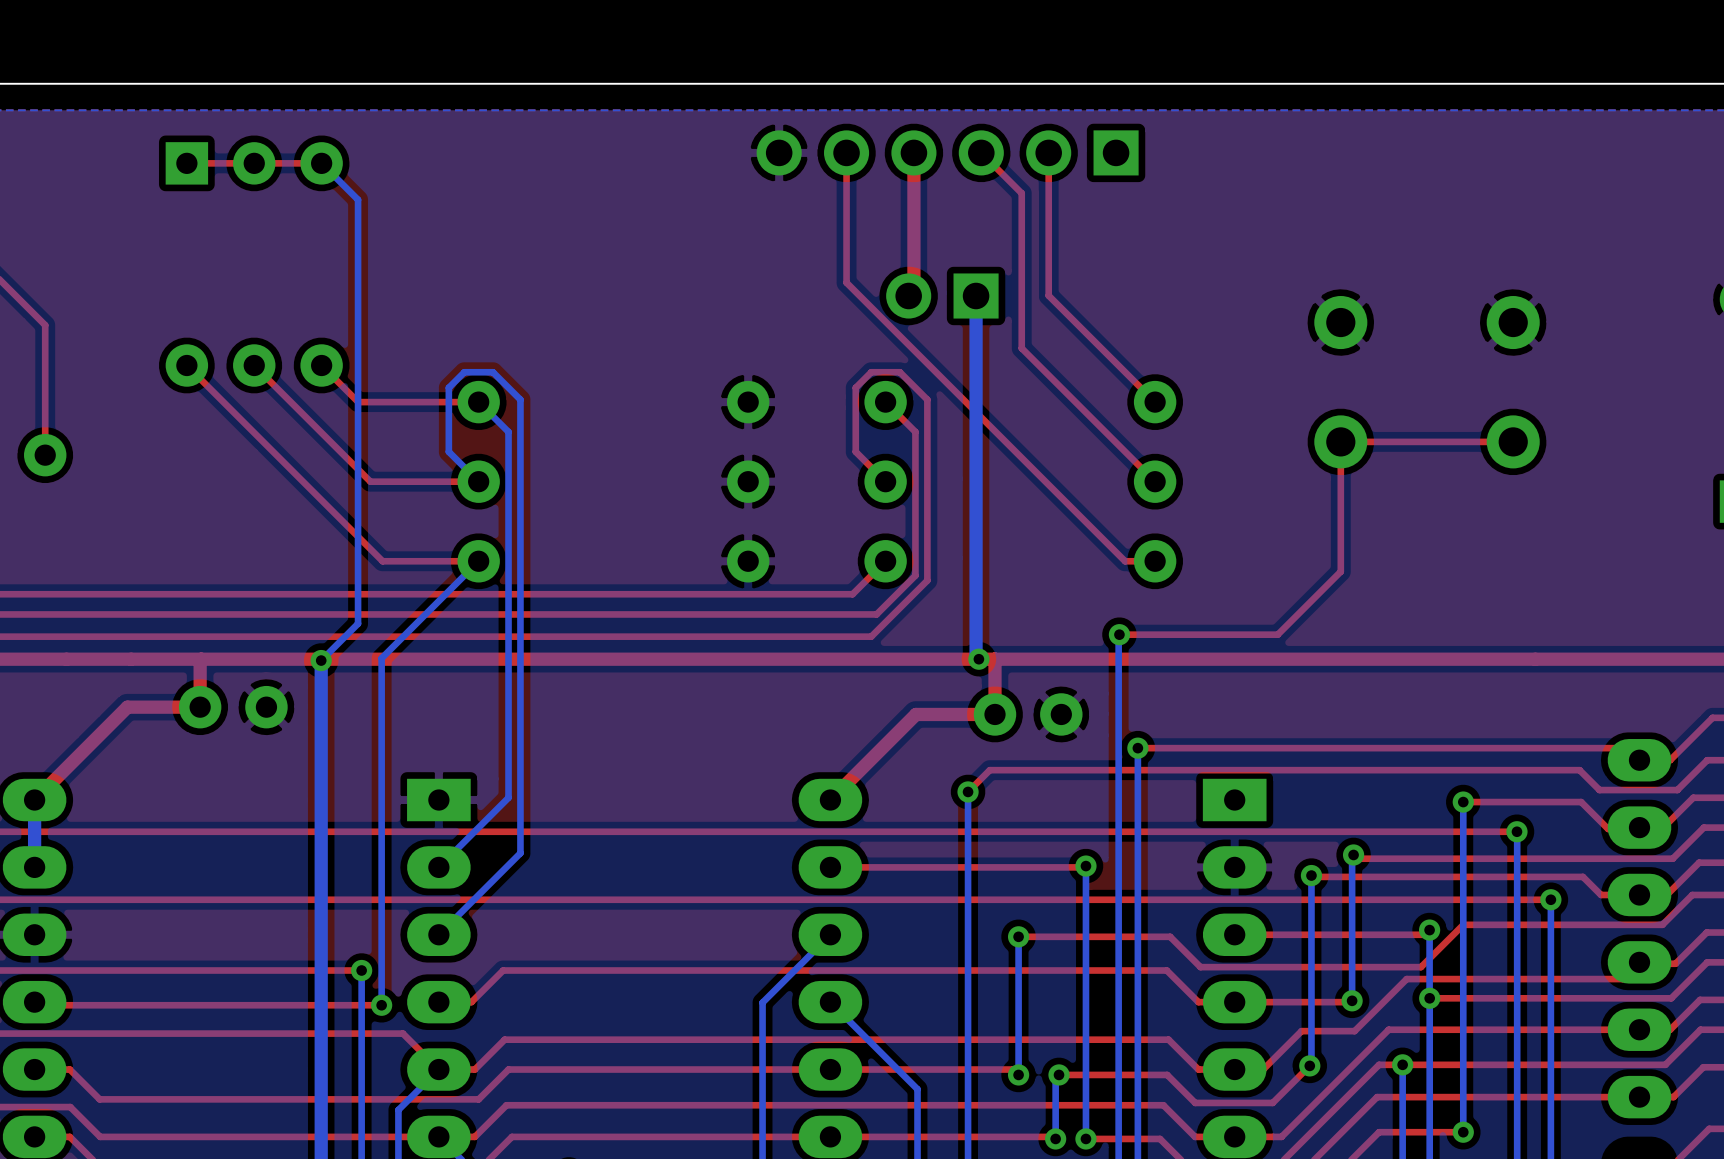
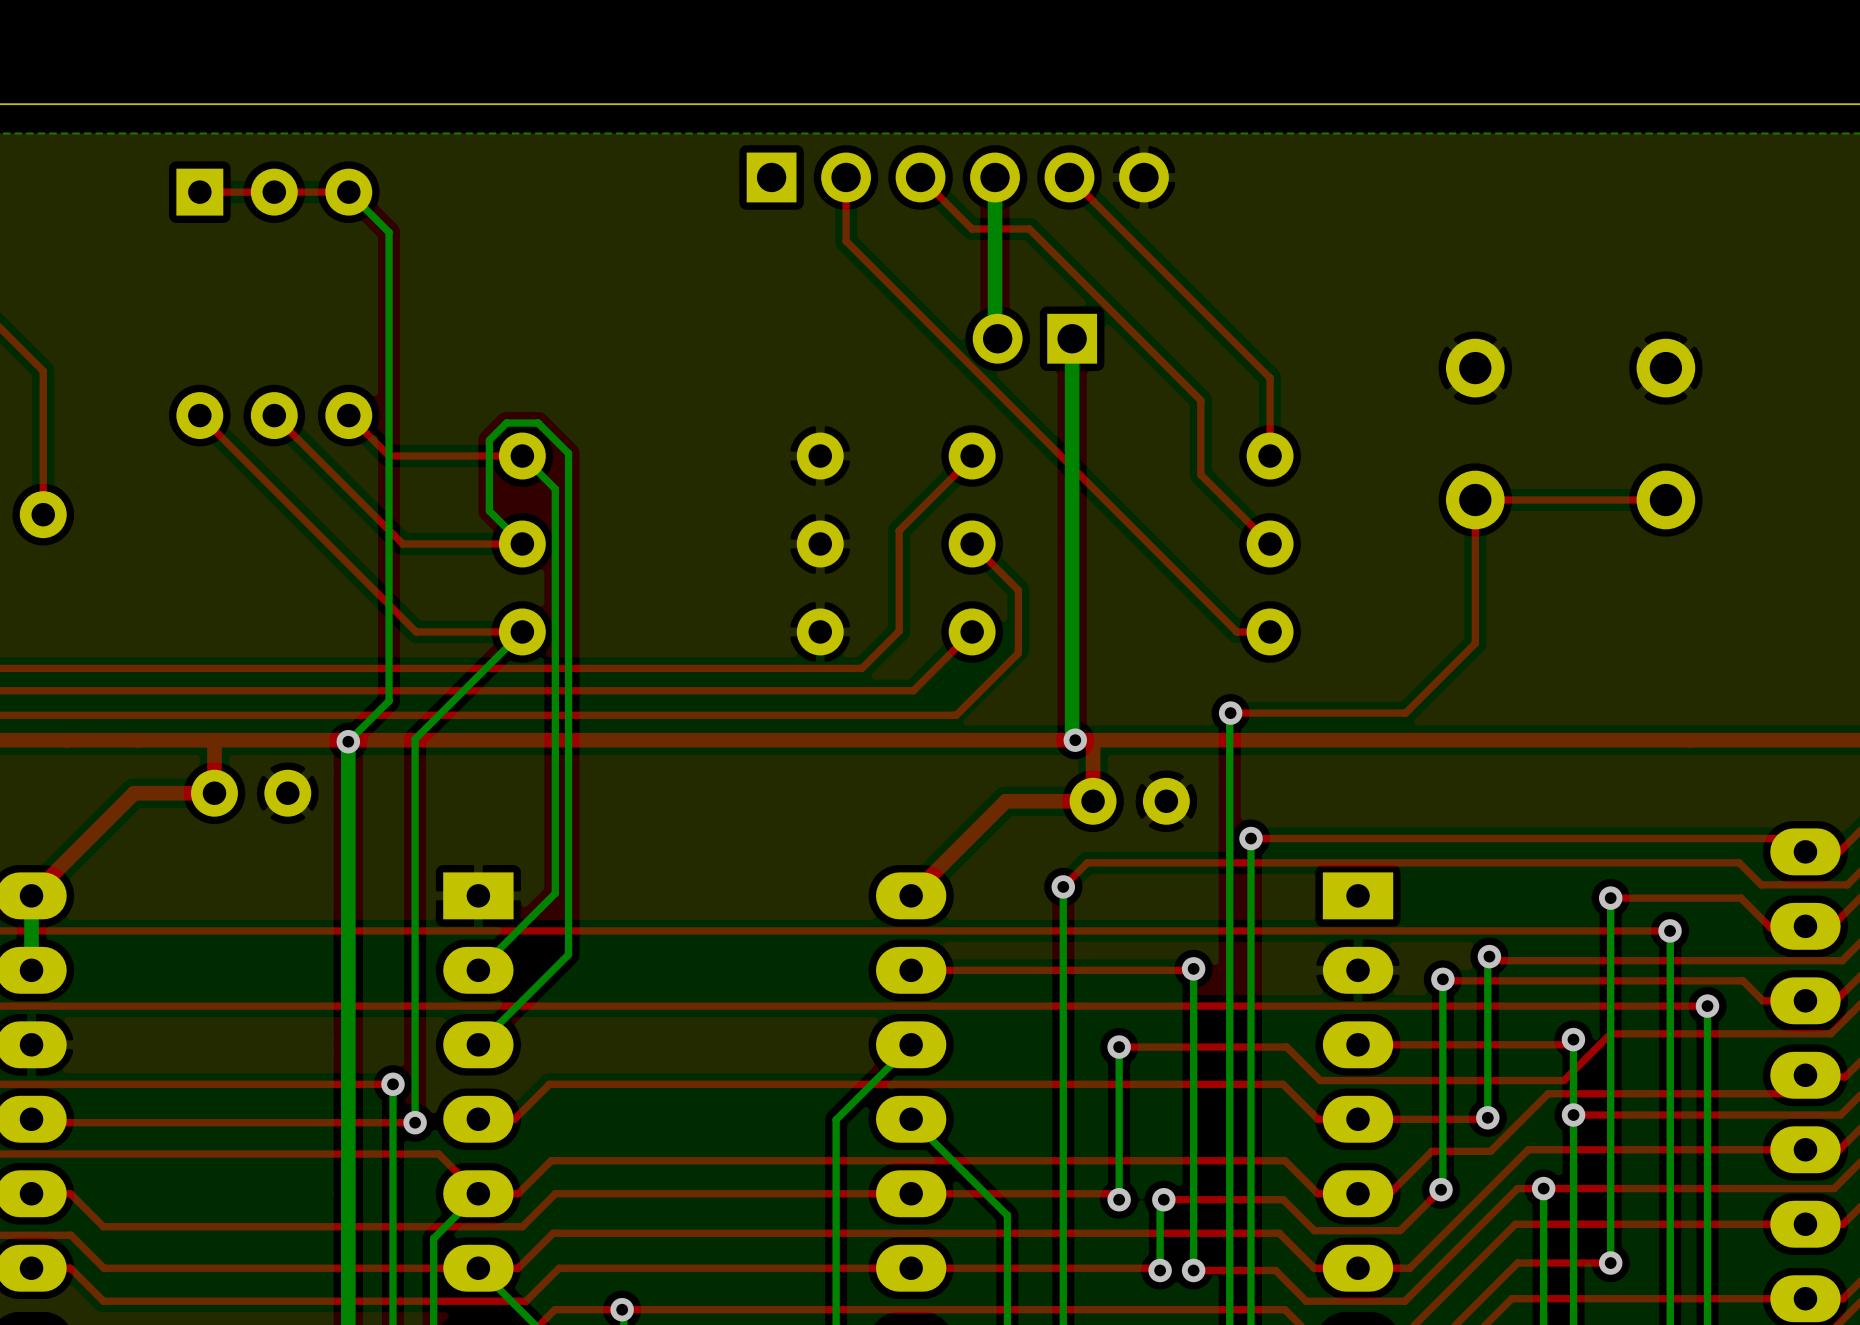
bottom track: none -> (995, 177) (995, 336) (997, 338)
top track: (846, 152) (846, 282) -> (846, 177) (846, 241) (928, 324)
top track: (913, 152) (913, 290) (908, 296) -> none
part rotation: 0° (947, 152) -> 180° (957, 177)
top track: (981, 152) (1021, 193) (1021, 348) (1092, 419) -> (920, 177) (972, 228) (1029, 228) (1200, 400) (1200, 474)
top track: (1048, 152) (1048, 295) (1155, 402) -> (1069, 177) (1270, 378) (1270, 456)
top track: (885, 402) (915, 431) (915, 575) (876, 614) (832, 614) -> (972, 456) (899, 530) (899, 631) (861, 668)
top track: (885, 481) (855, 451) (855, 387) (871, 372) (899, 372) (927, 399) (927, 523) -> (972, 543) (1018, 590)
top track: (852, 594) (785, 594) -> (935, 668) (913, 690)

